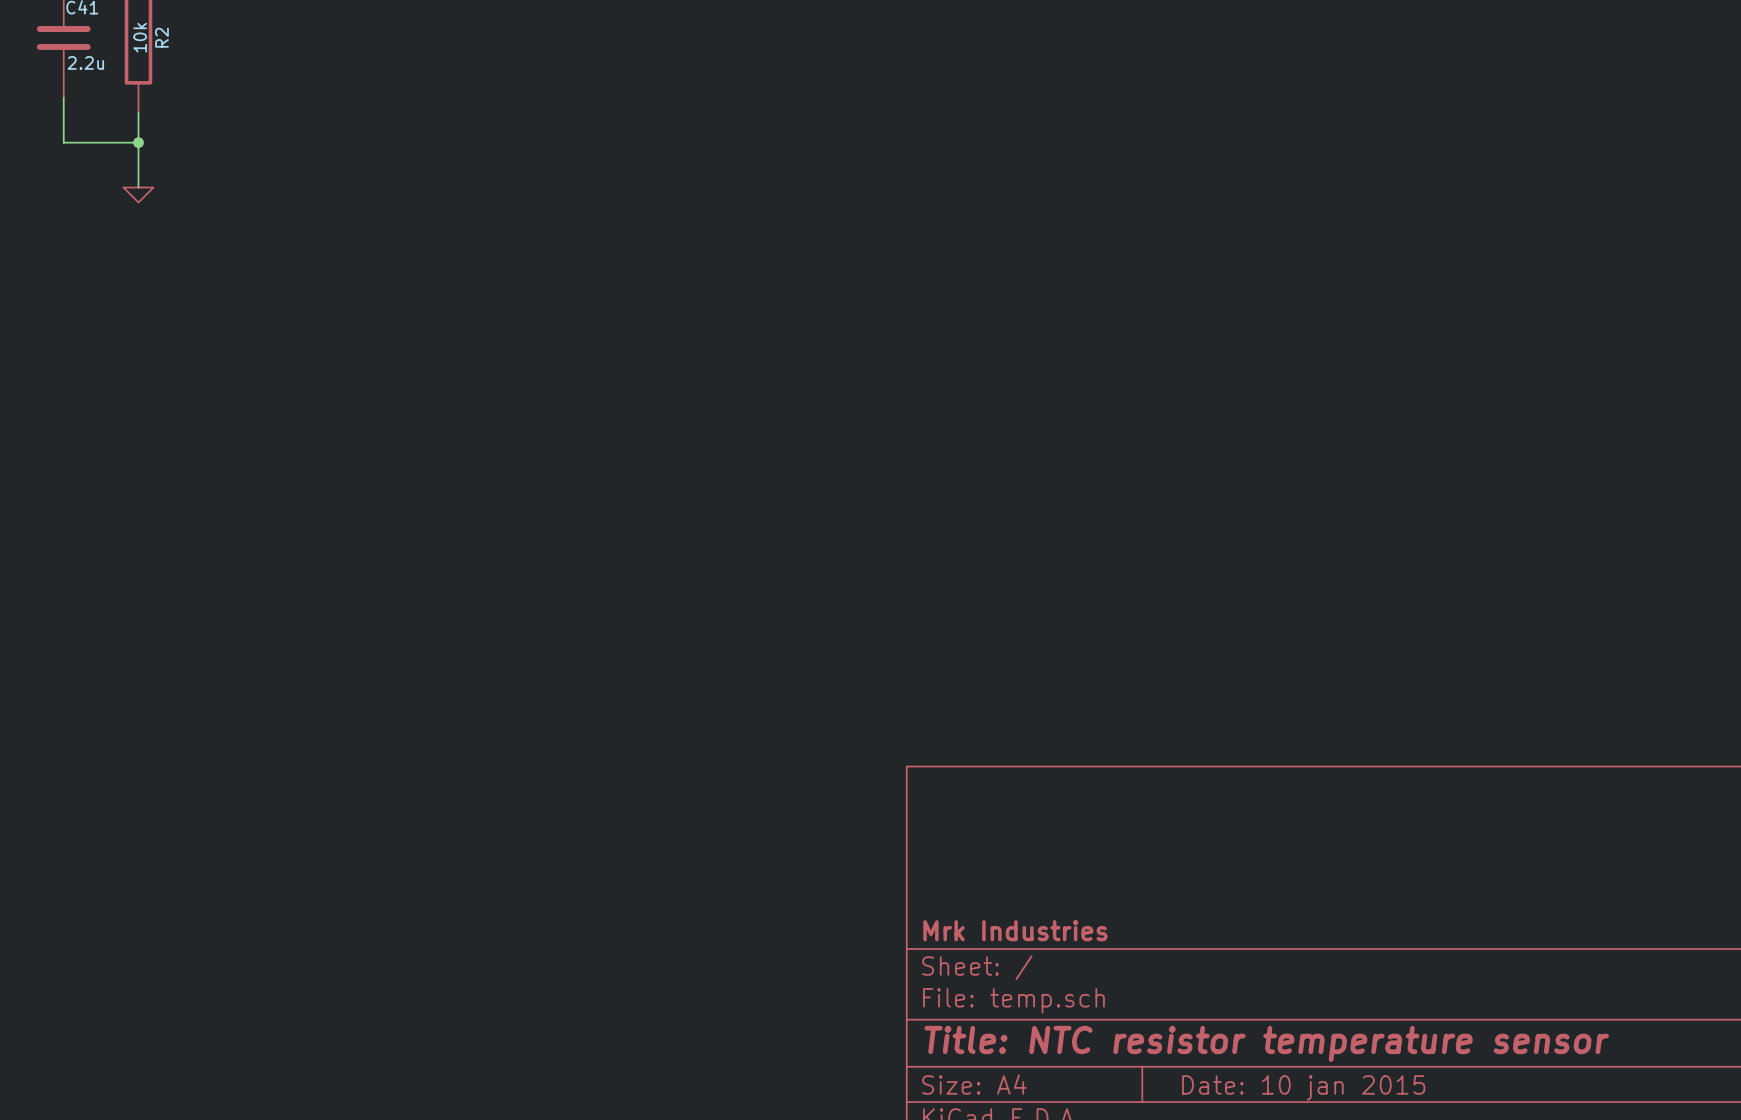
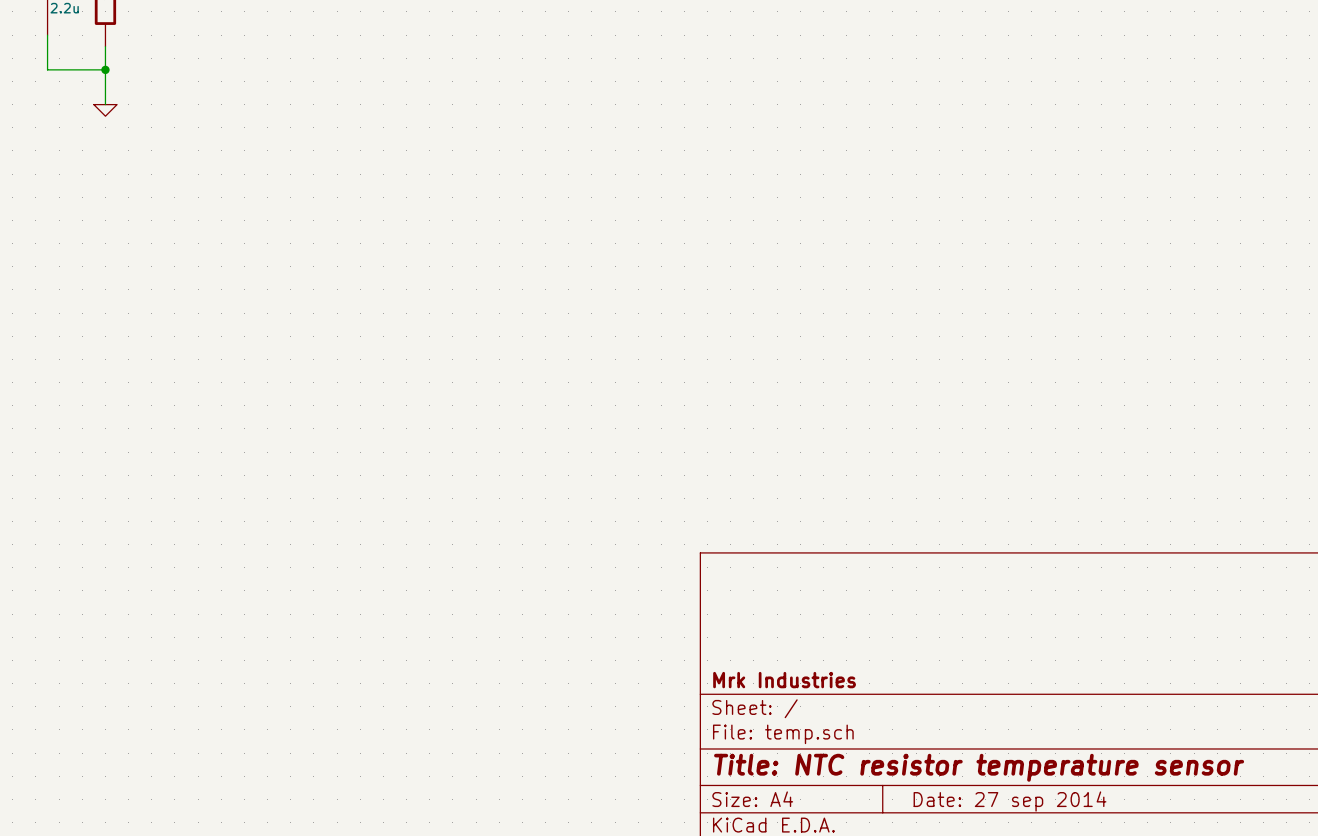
title block: Date: 10 jan 2015 (1303, 1087) -> Date: 27 sep 2014 (1010, 801)

